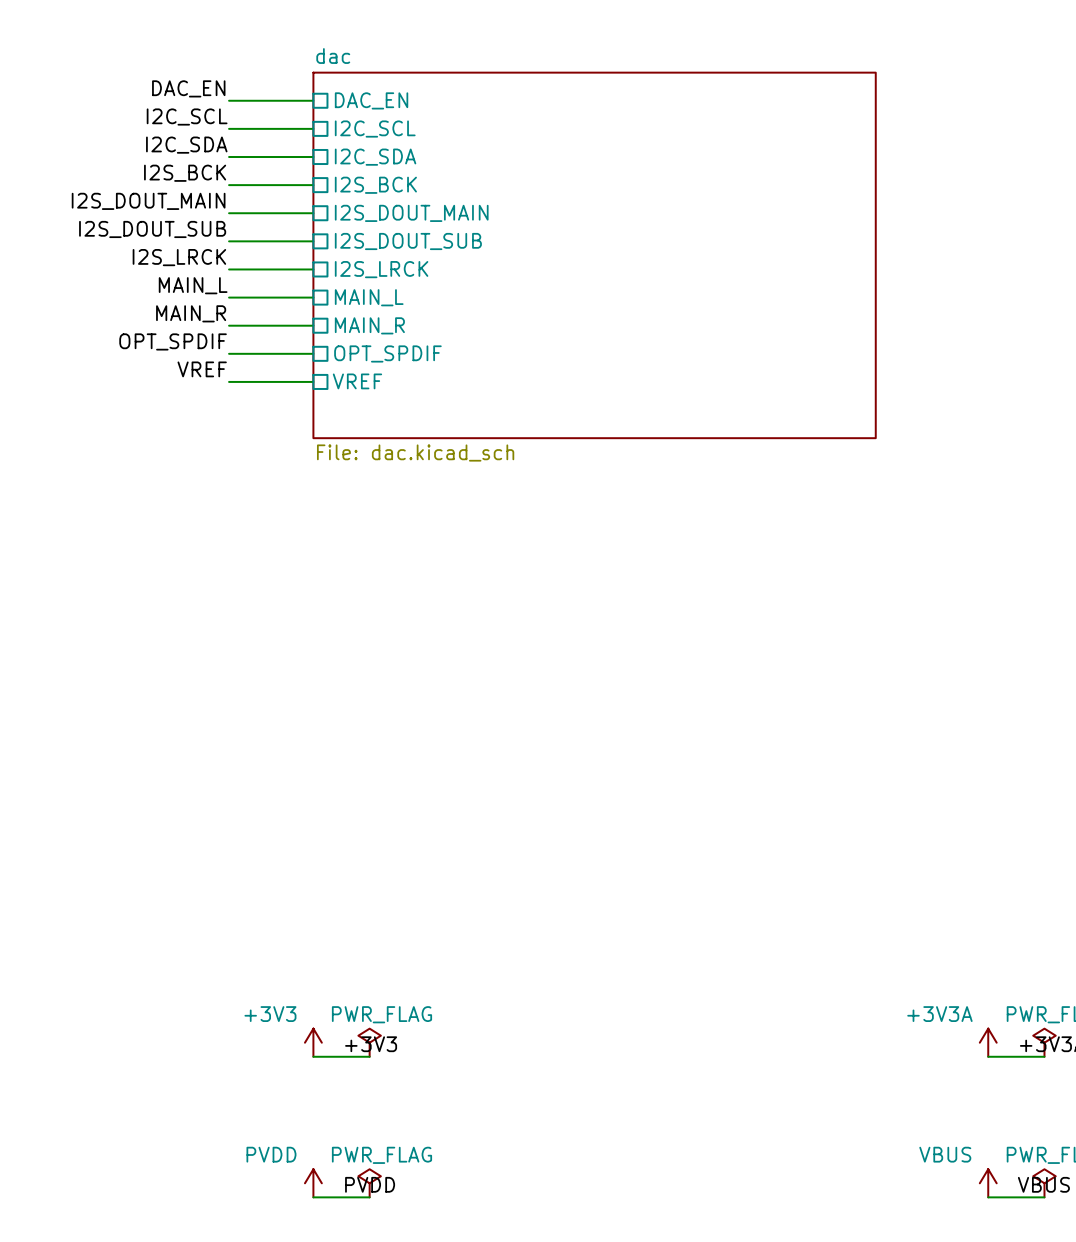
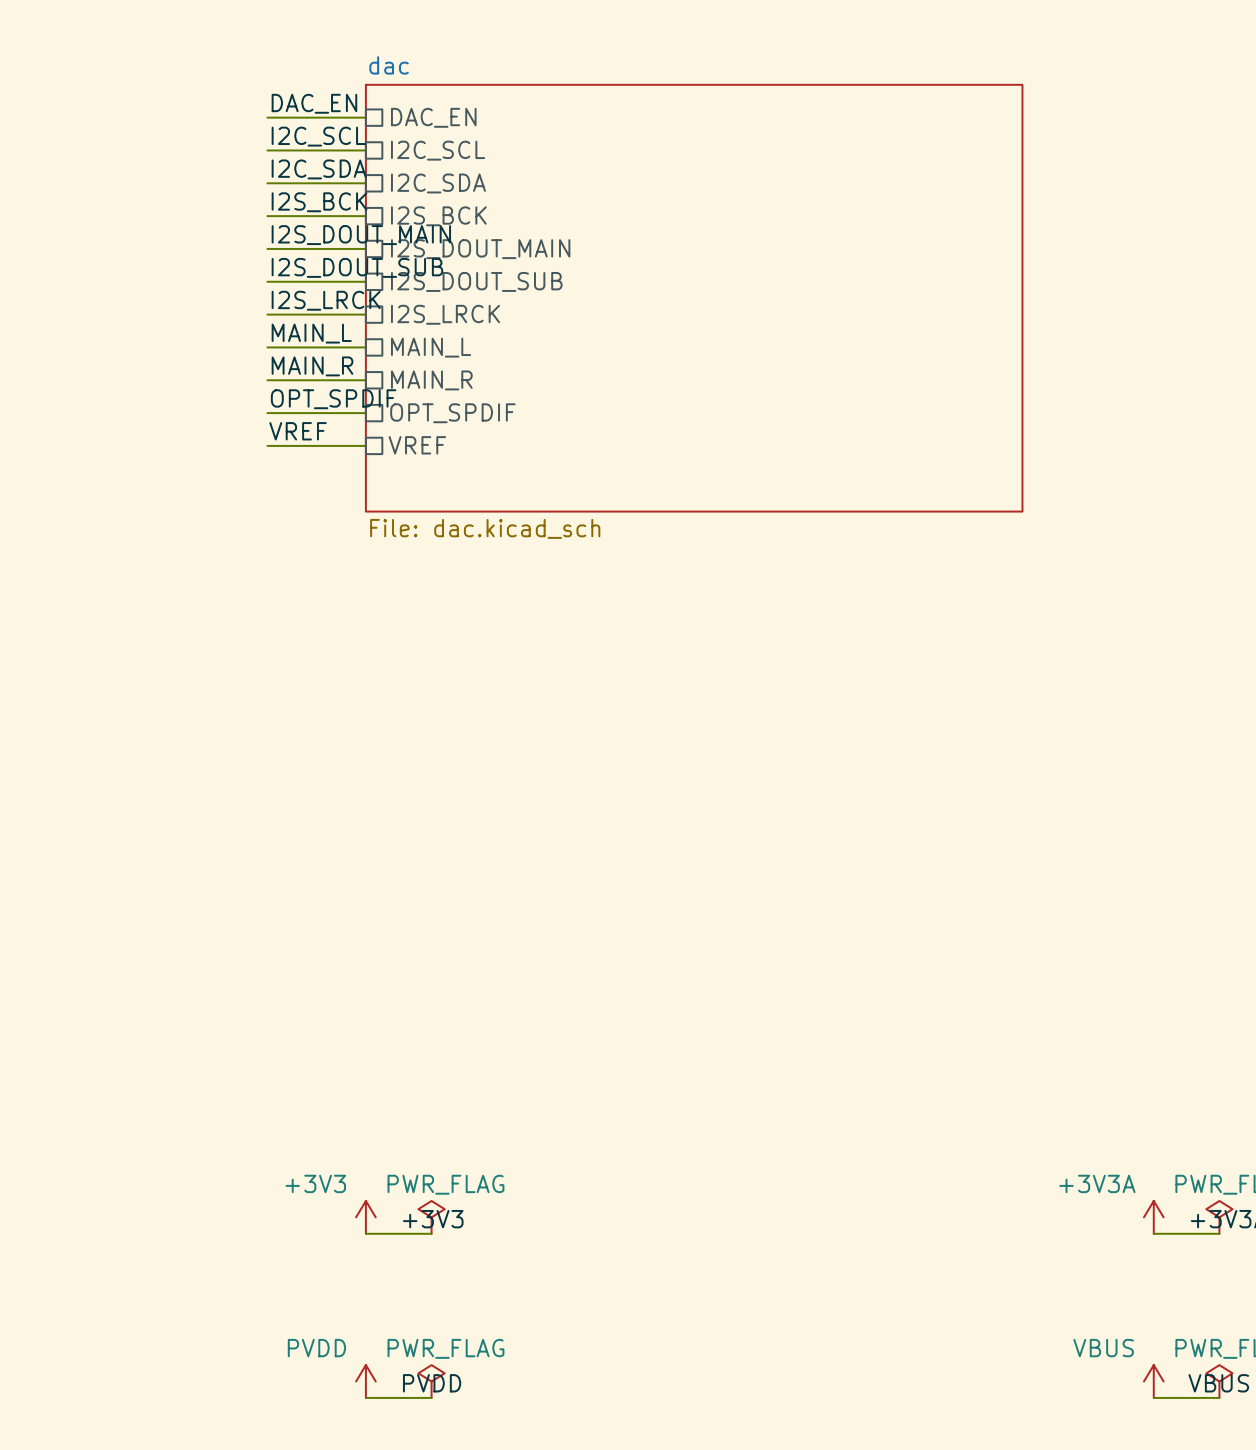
label position: DAC_EN (188, 88) -> DAC_EN (314, 103)
label position: I2C_SCL (187, 117) -> I2C_SCL (318, 136)
label position: I2C_SDA (186, 145) -> I2C_SDA (319, 169)
label position: I2S_BCK (185, 173) -> I2S_BCK (319, 202)
label position: I2S_DOUT_MAIN (148, 201) -> I2S_DOUT_MAIN (361, 235)
label position: I2S_DOUT_SUB (152, 229) -> I2S_DOUT_SUB (357, 267)
label position: I2S_LRCK (179, 257) -> I2S_LRCK (326, 300)
label position: MAIN_L (193, 285) -> MAIN_L (311, 333)
label position: MAIN_R (191, 313) -> MAIN_R (312, 366)
label position: OPT_SPDIF (173, 341) -> OPT_SPDIF (333, 399)
label position: VREF (202, 369) -> VREF (298, 431)

